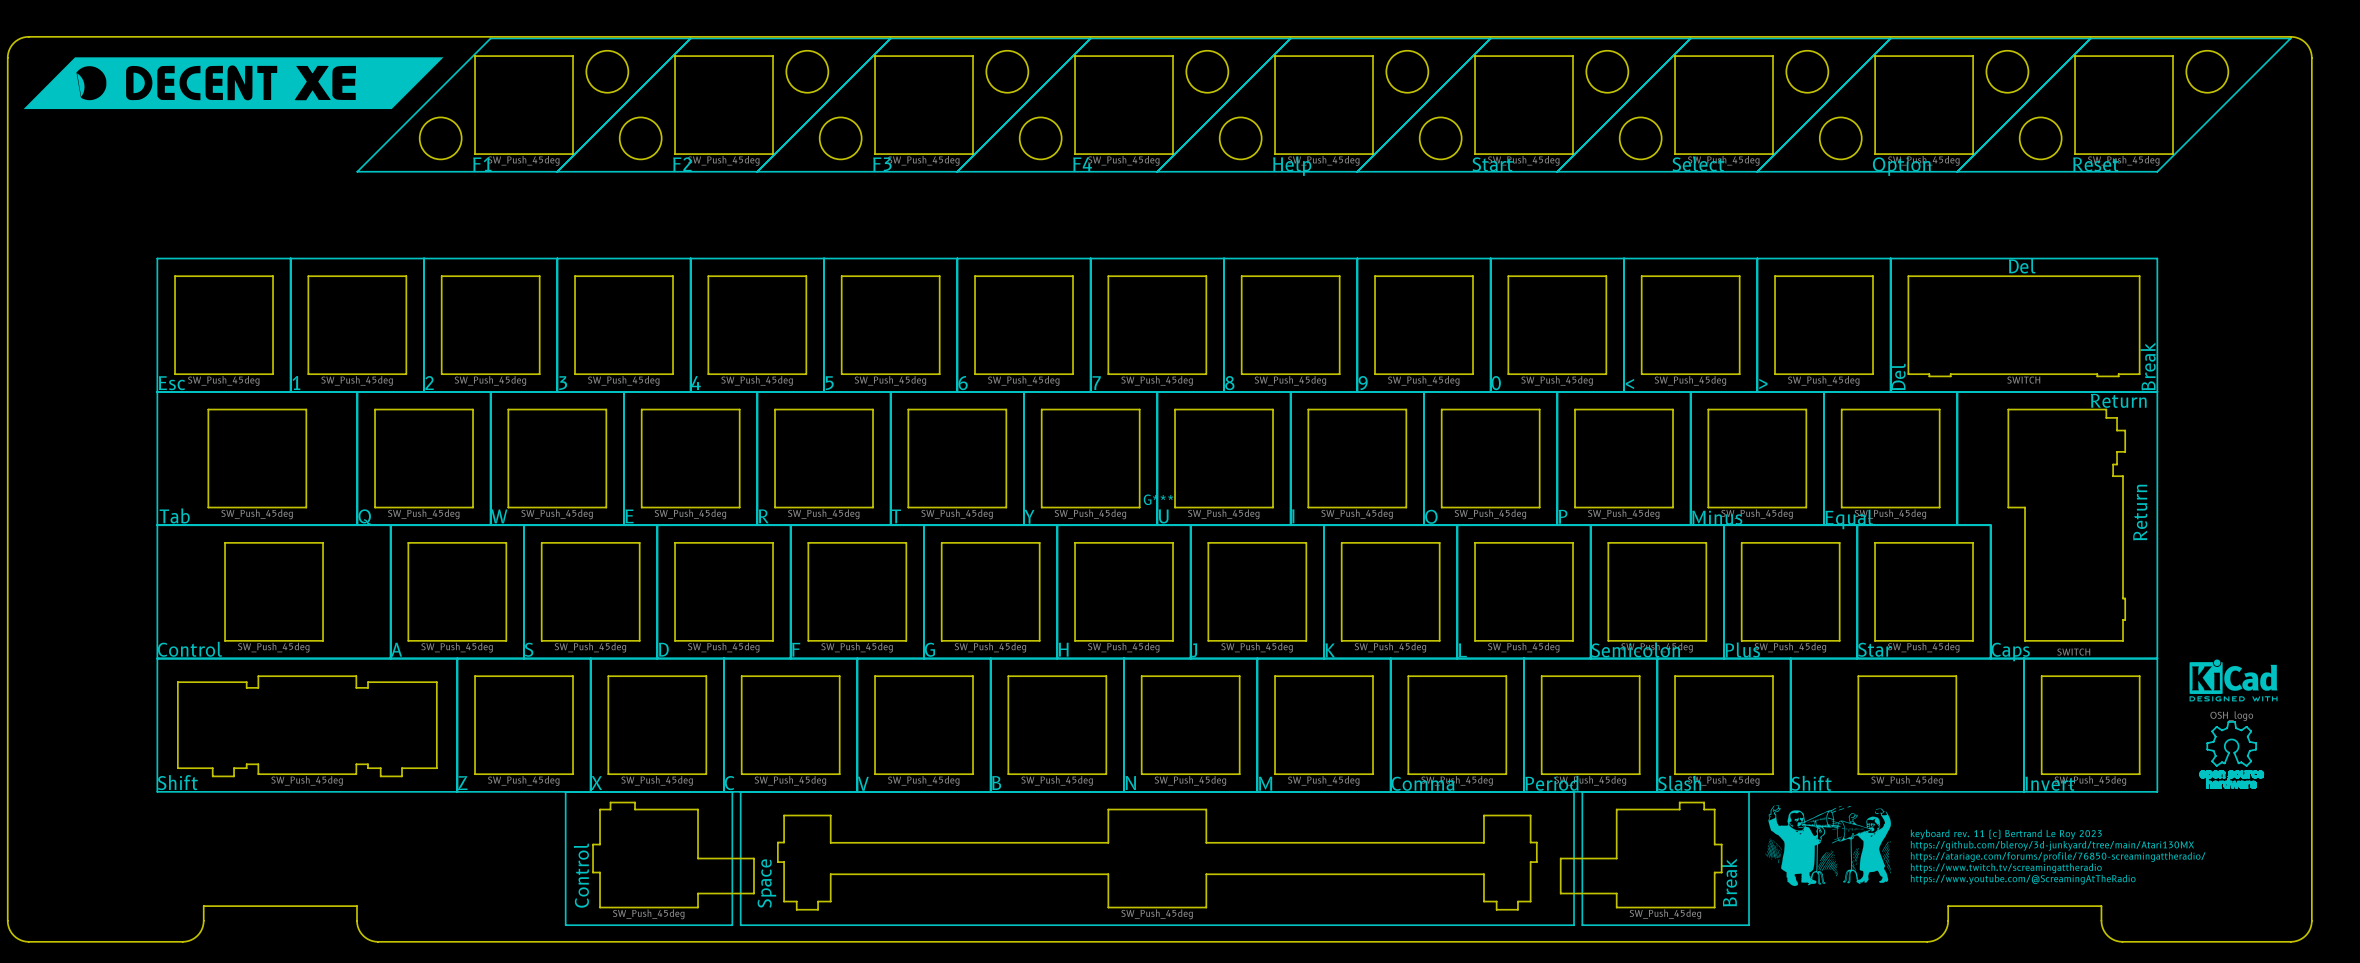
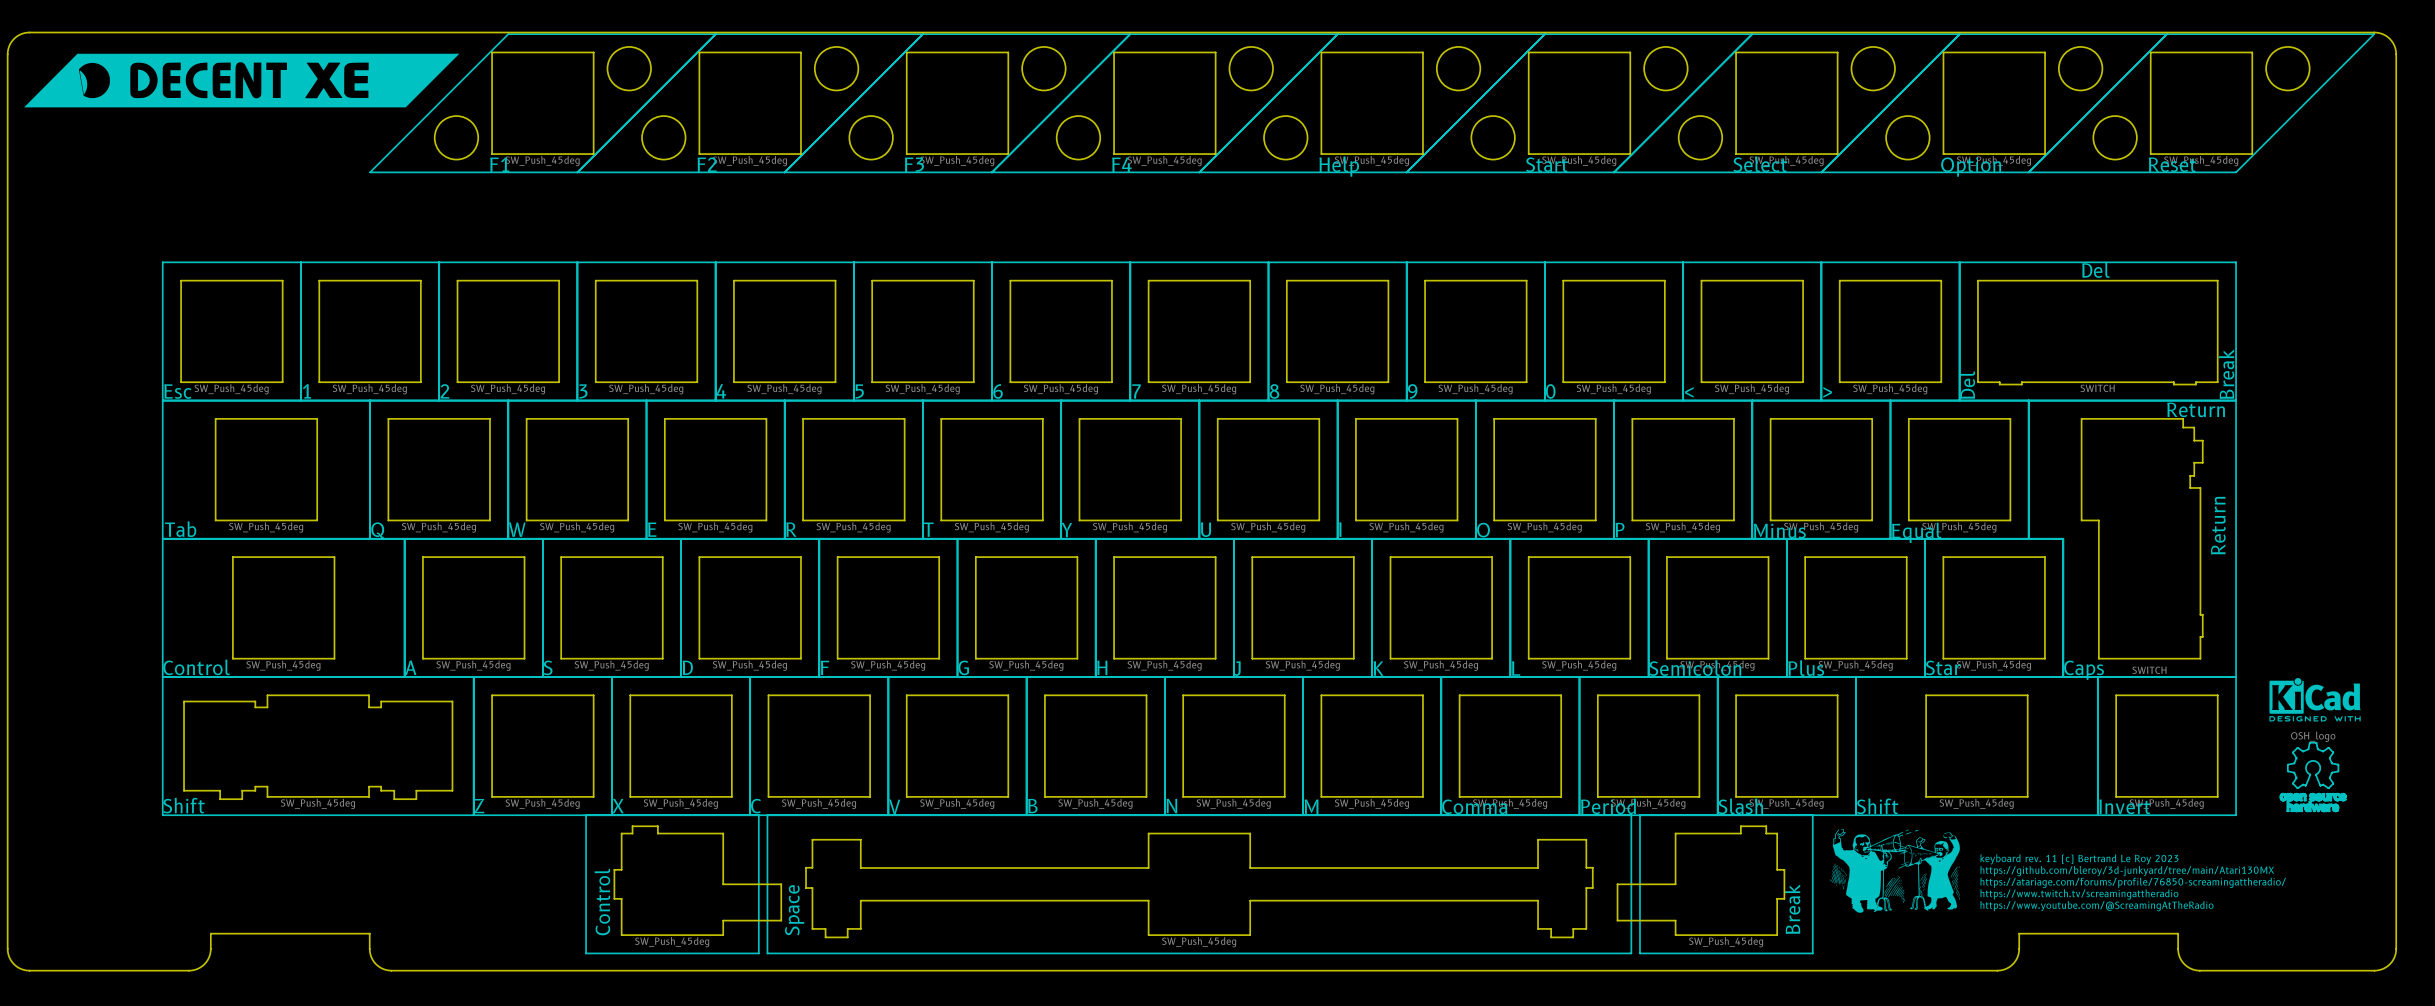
G***: (1158, 499) -> none

